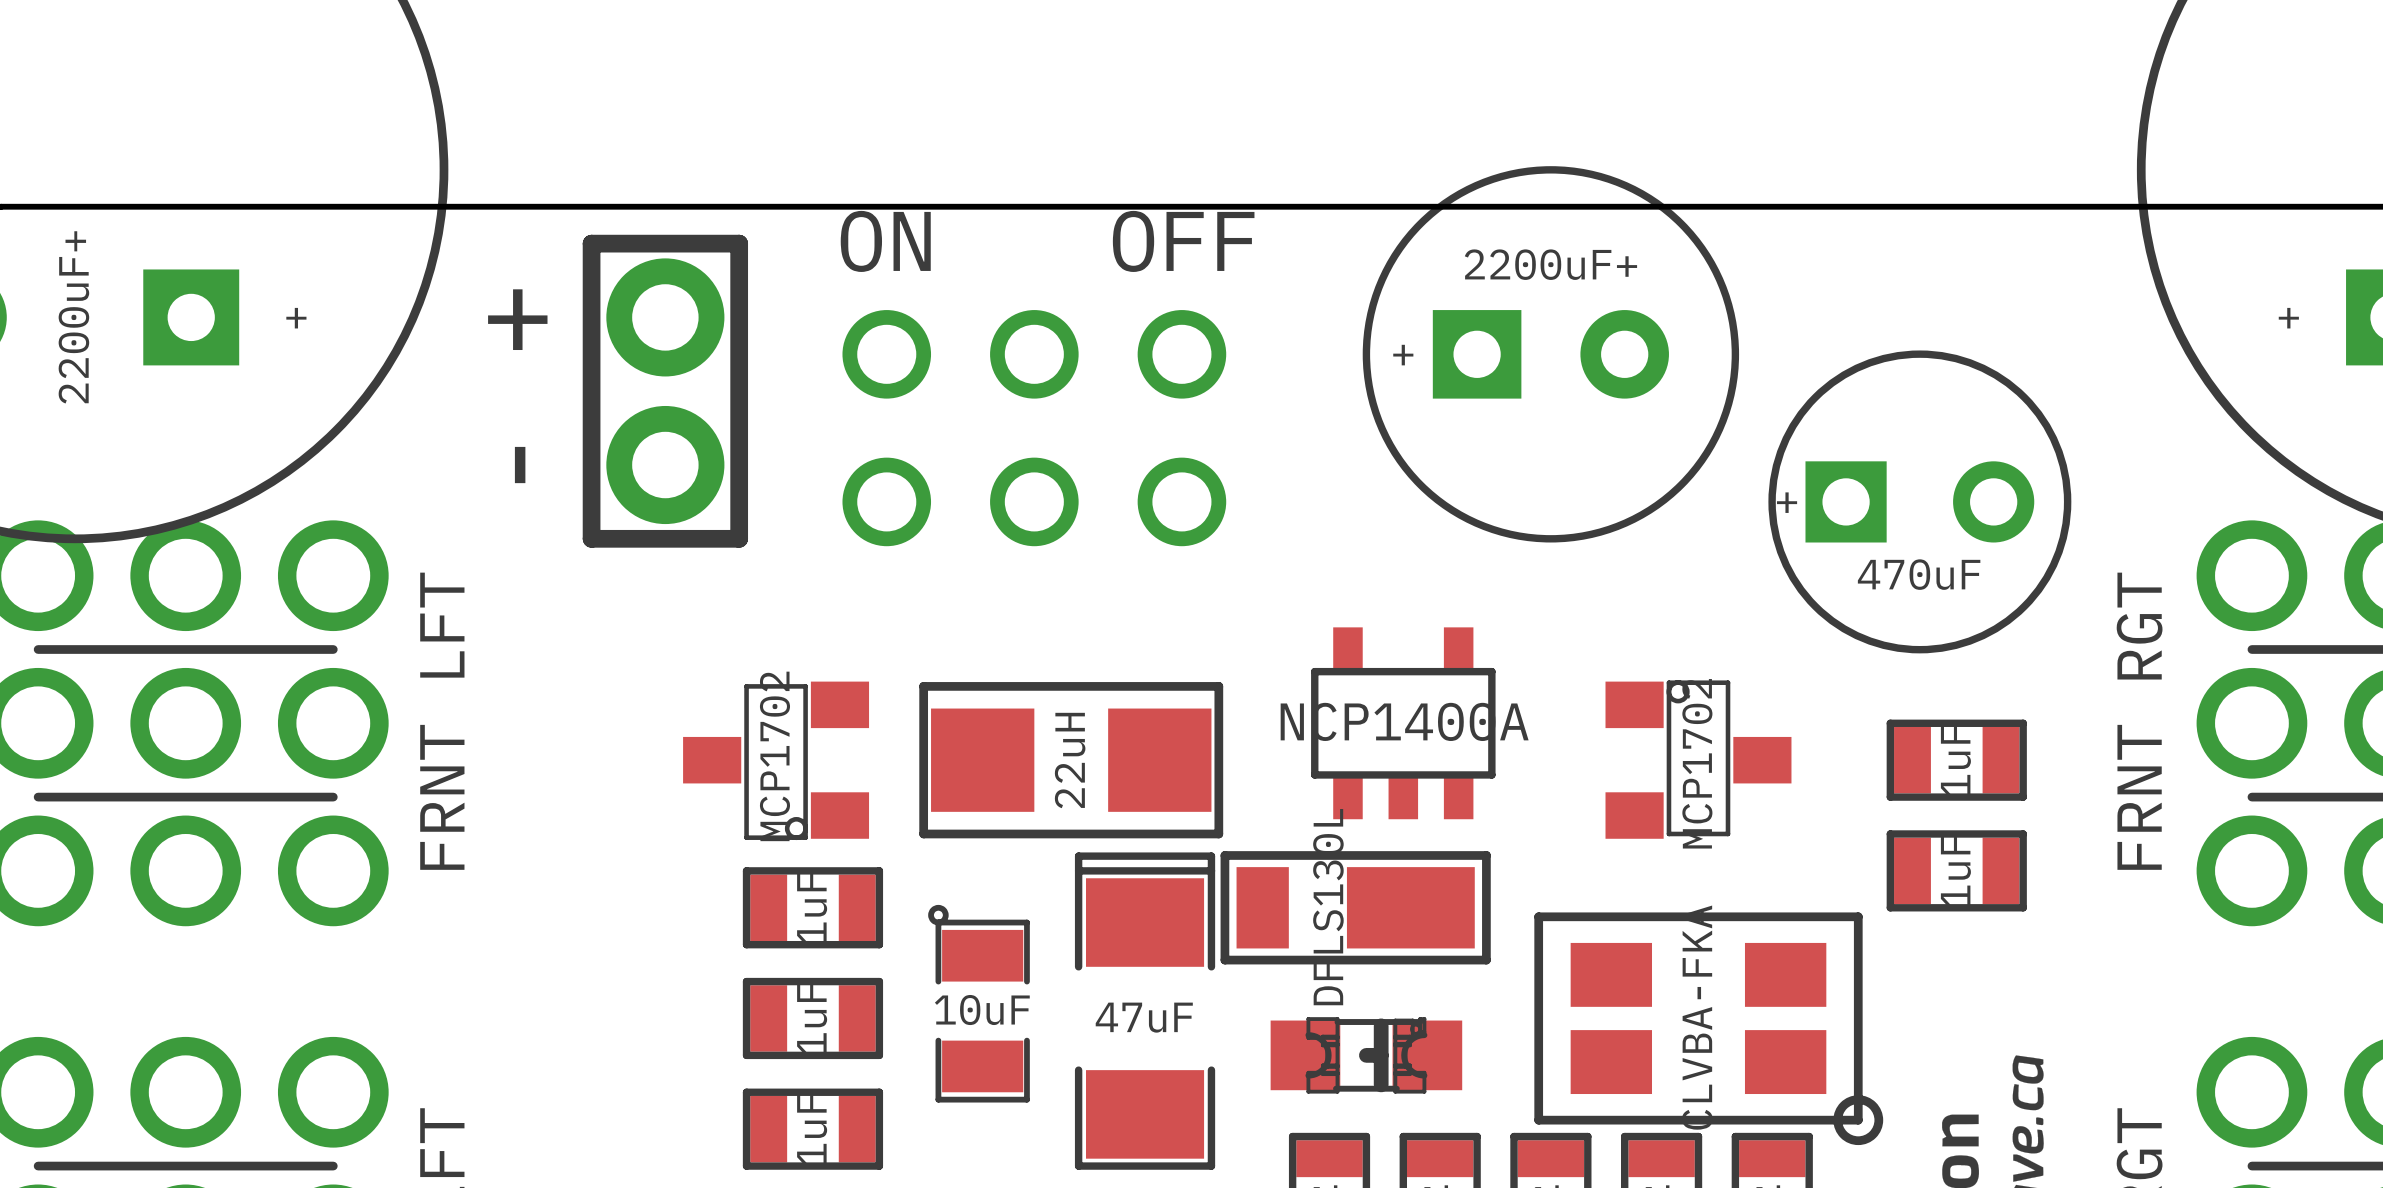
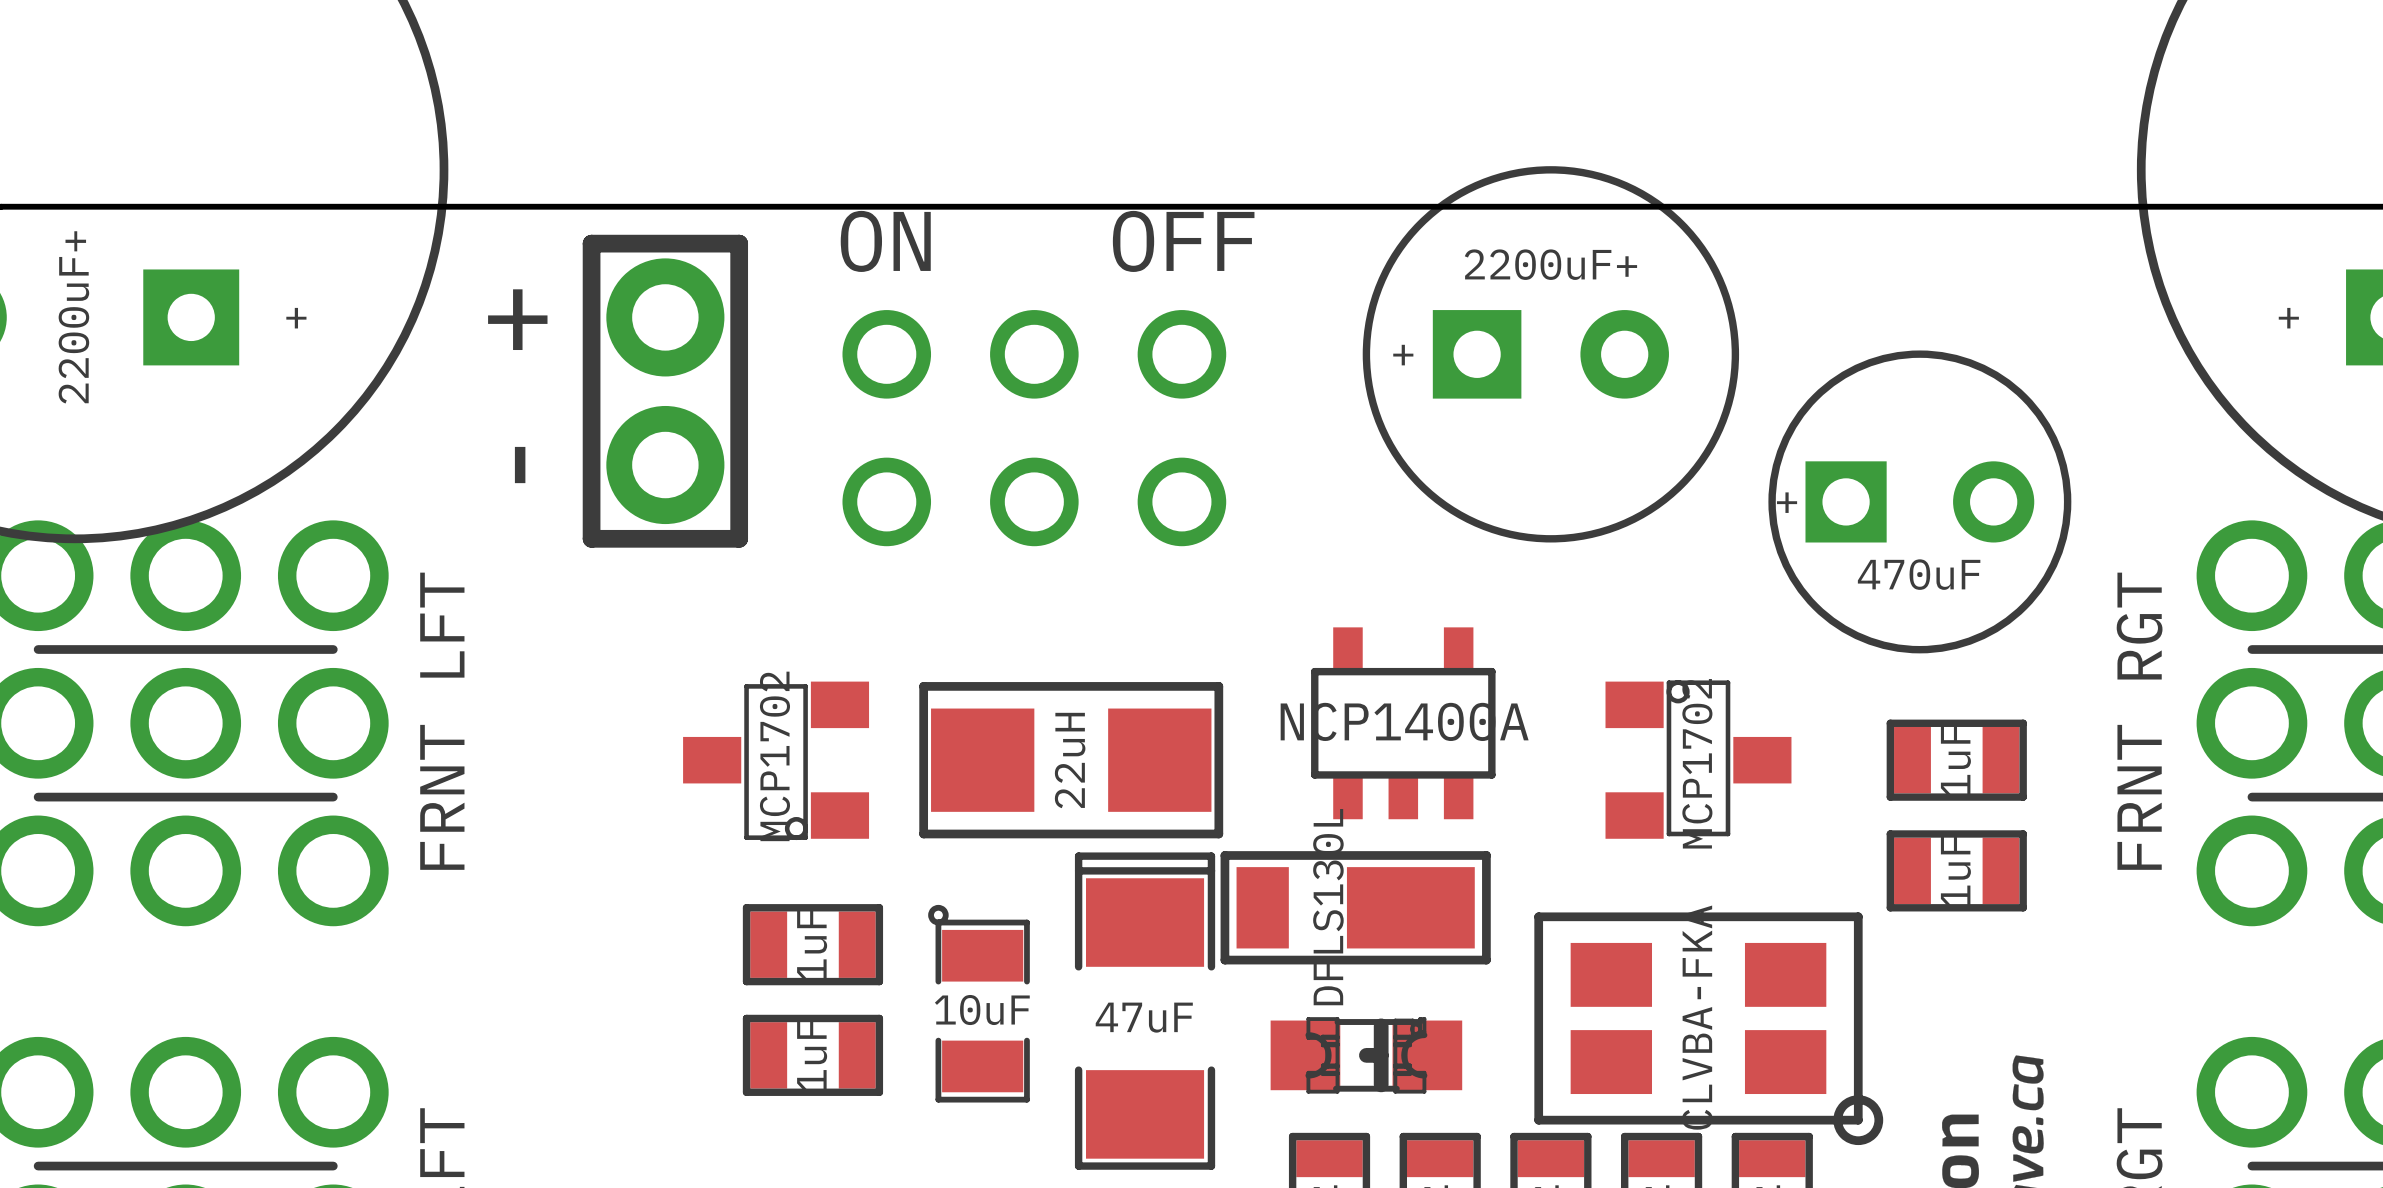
part: 1uF (812, 907) -> none
part: none -> 1uF (812, 944)
part: 1uF (812, 1018) -> none
part: none -> 1uF (812, 1055)
part: 1uF (812, 1129) -> none

